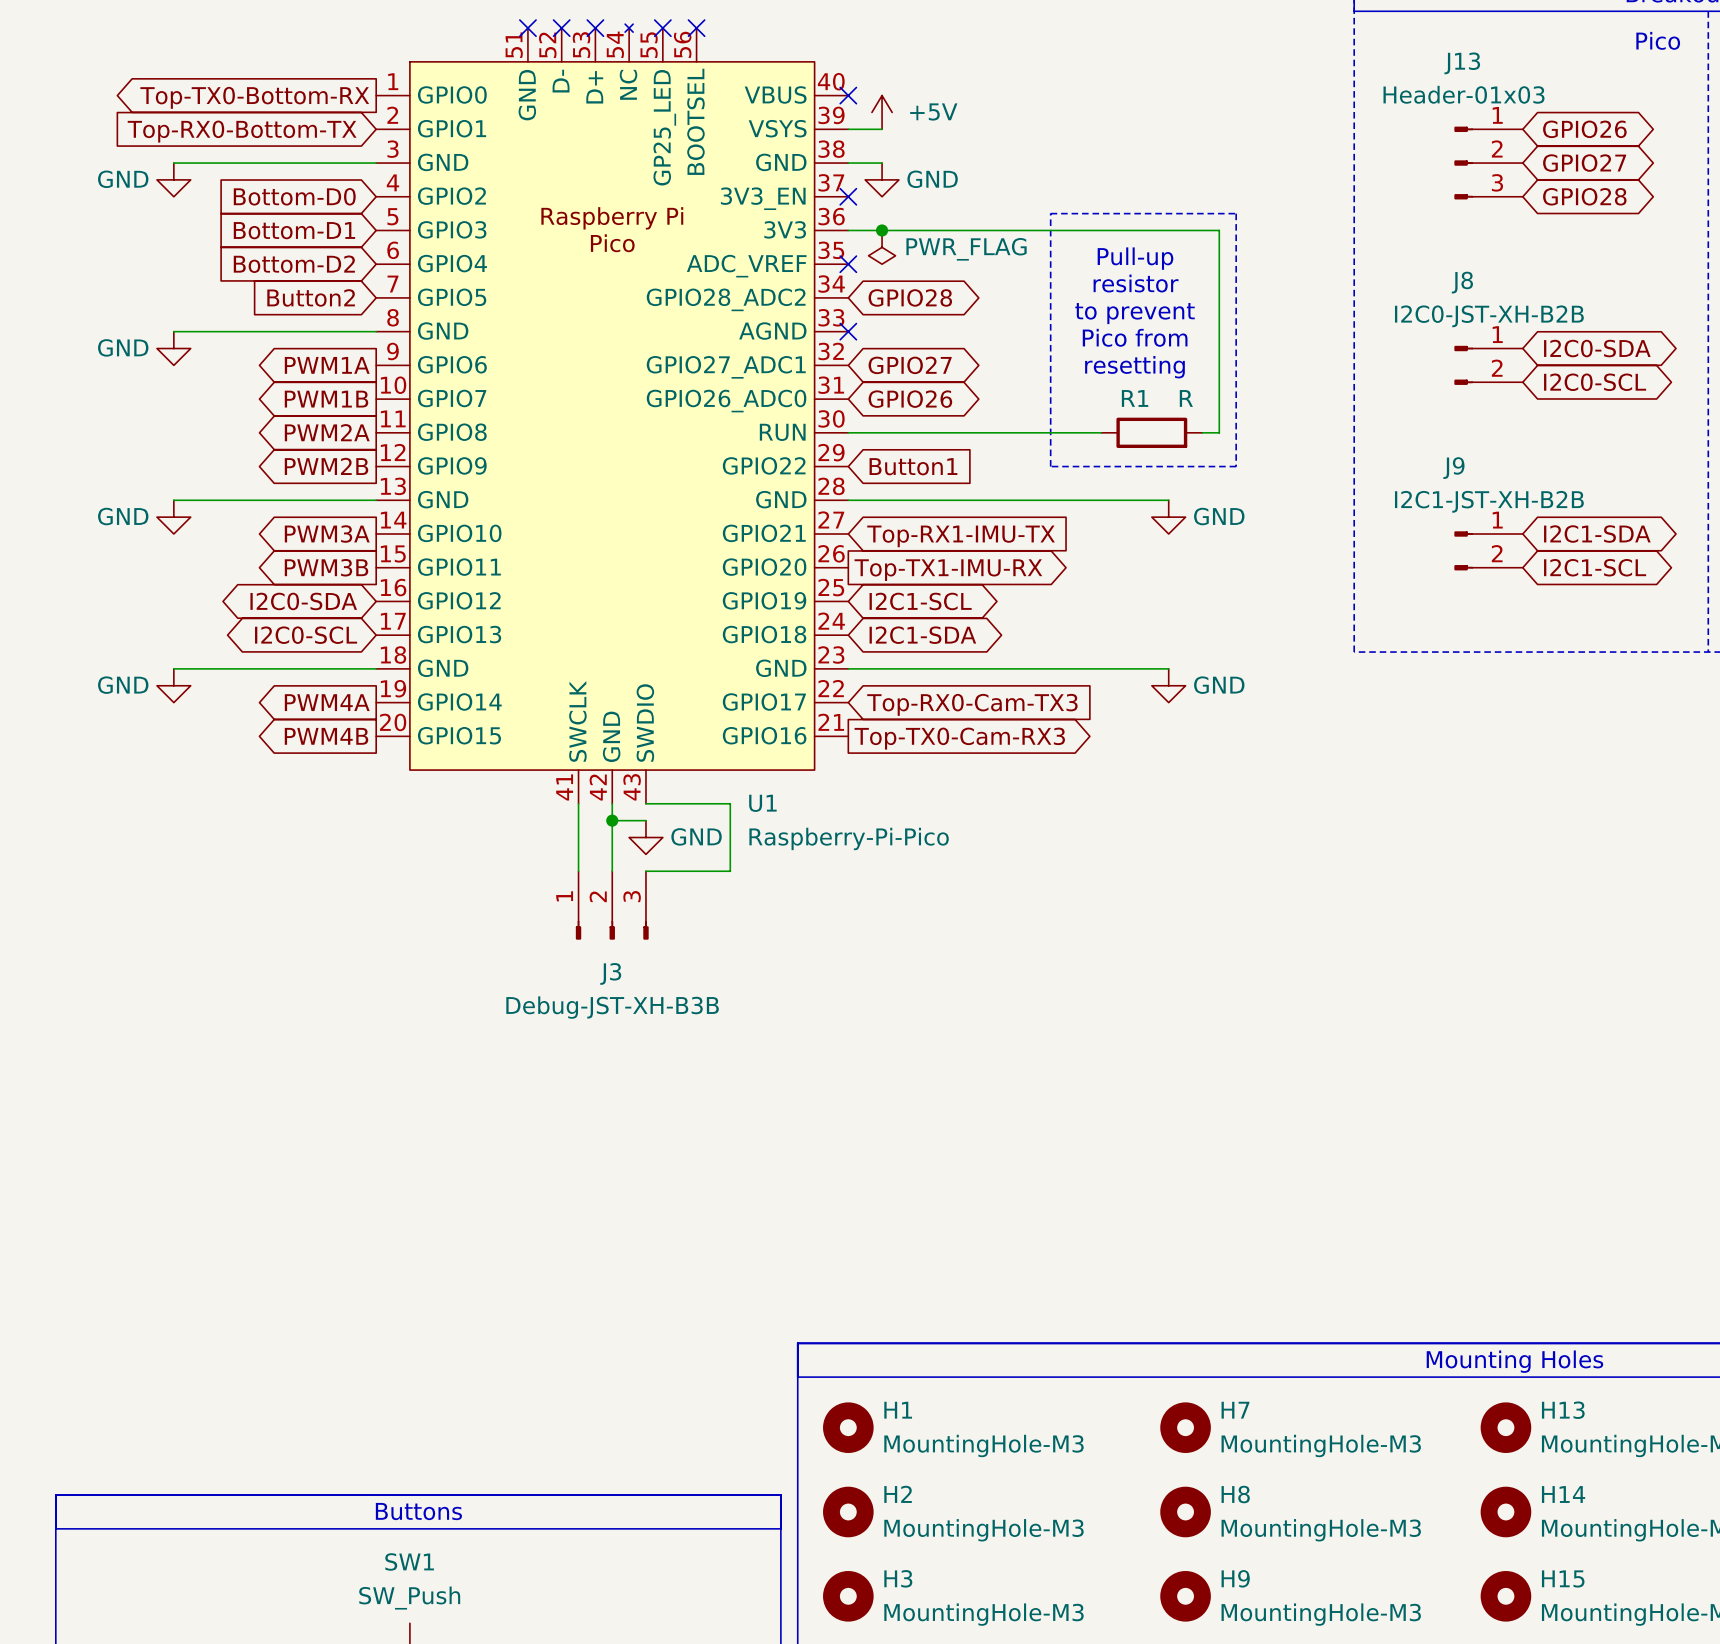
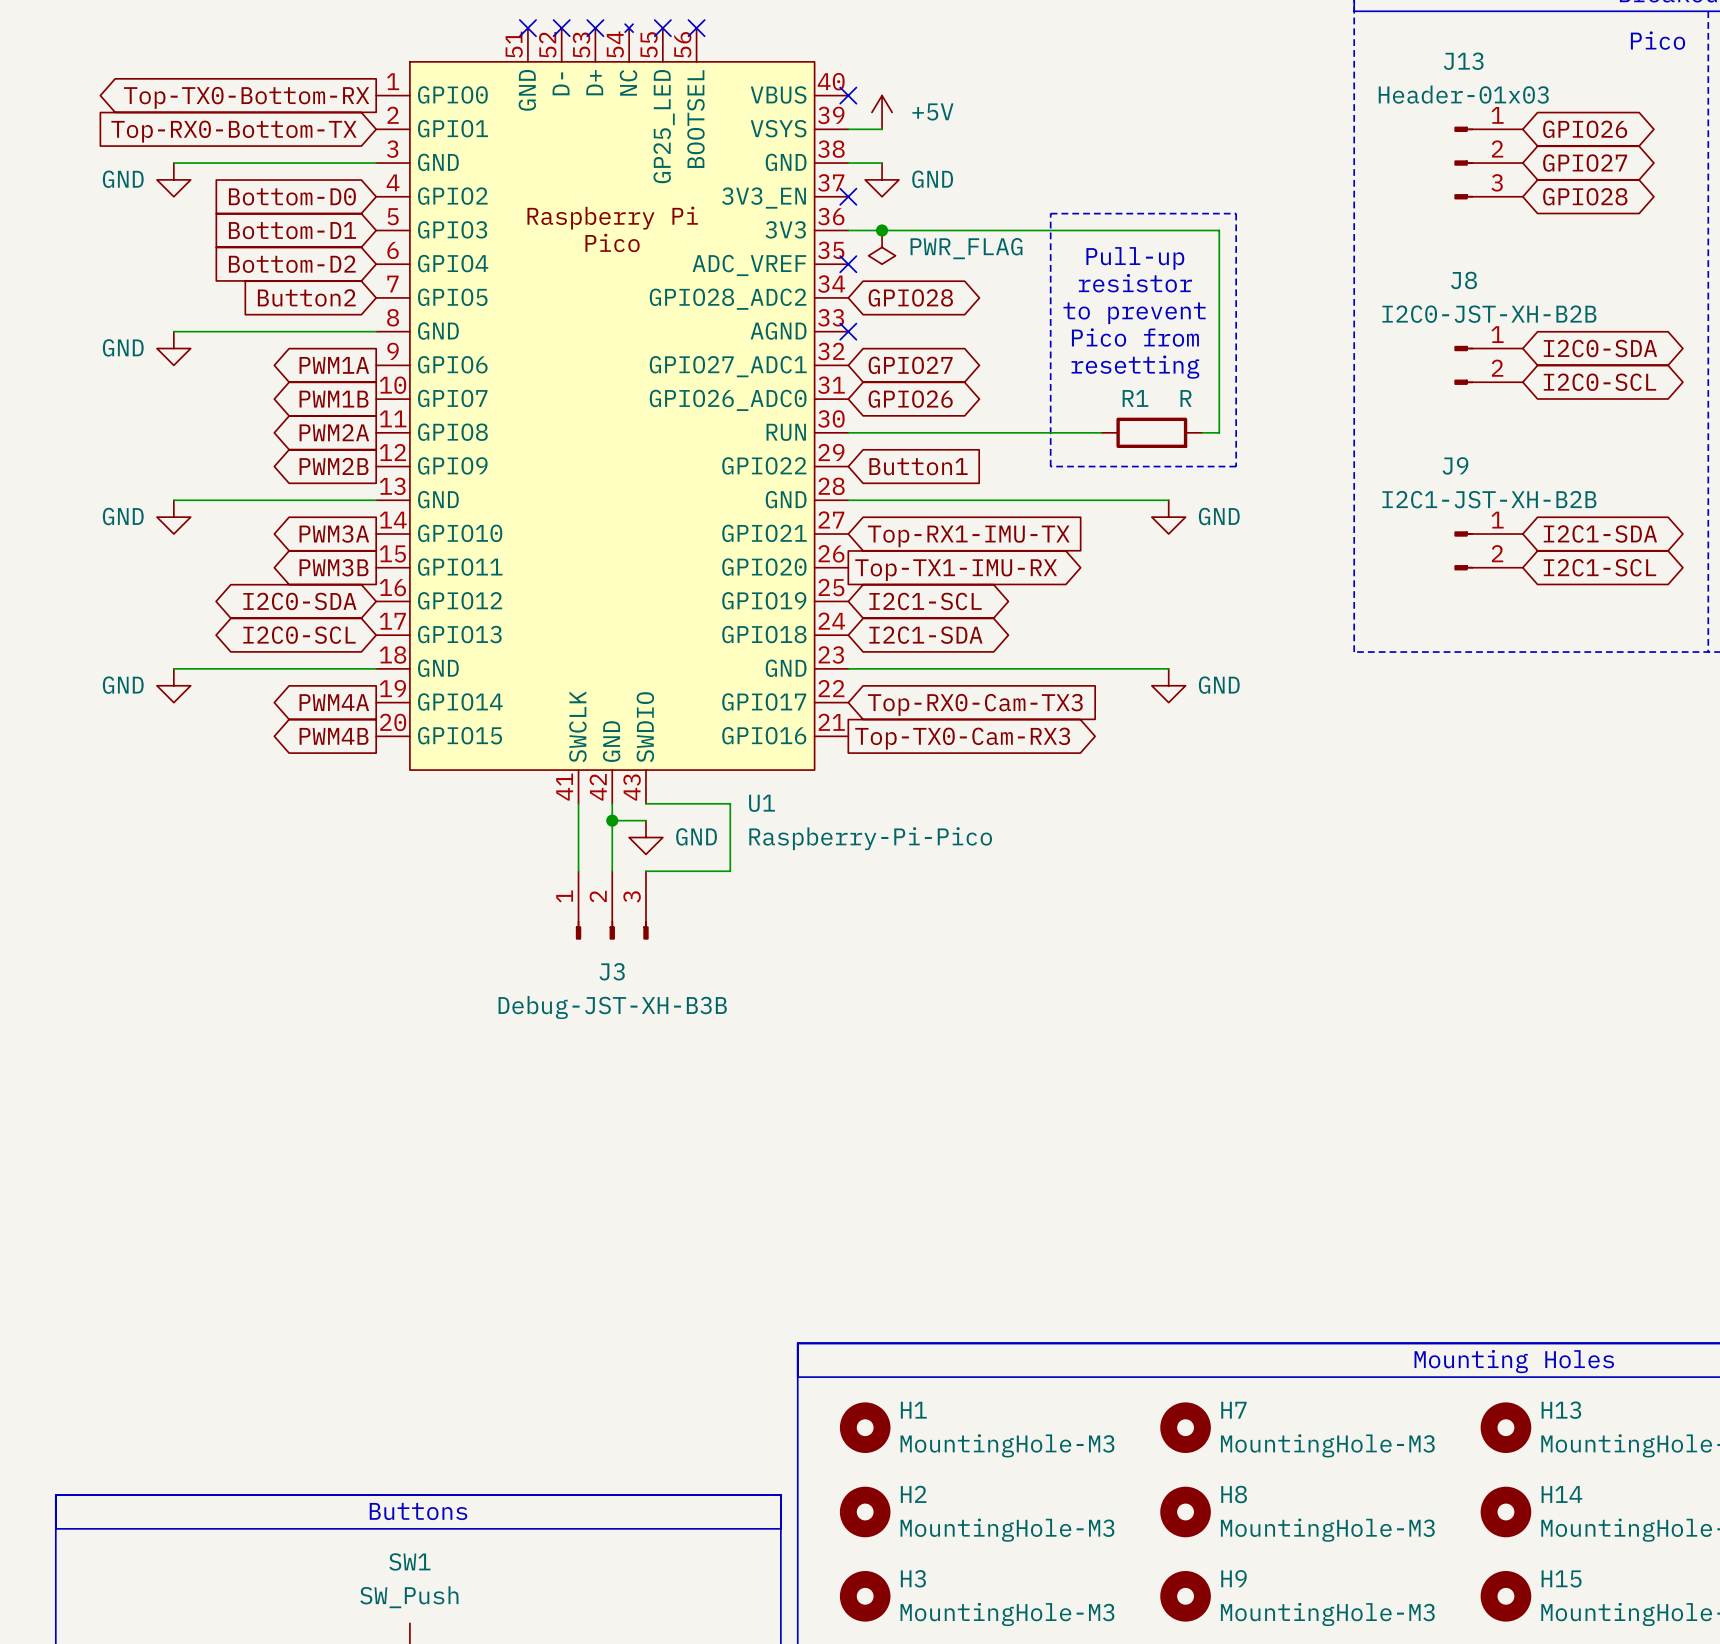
H1 position: (848, 1427) -> (865, 1427)
H2 position: (848, 1511) -> (865, 1511)
H3 position: (848, 1596) -> (865, 1596)

